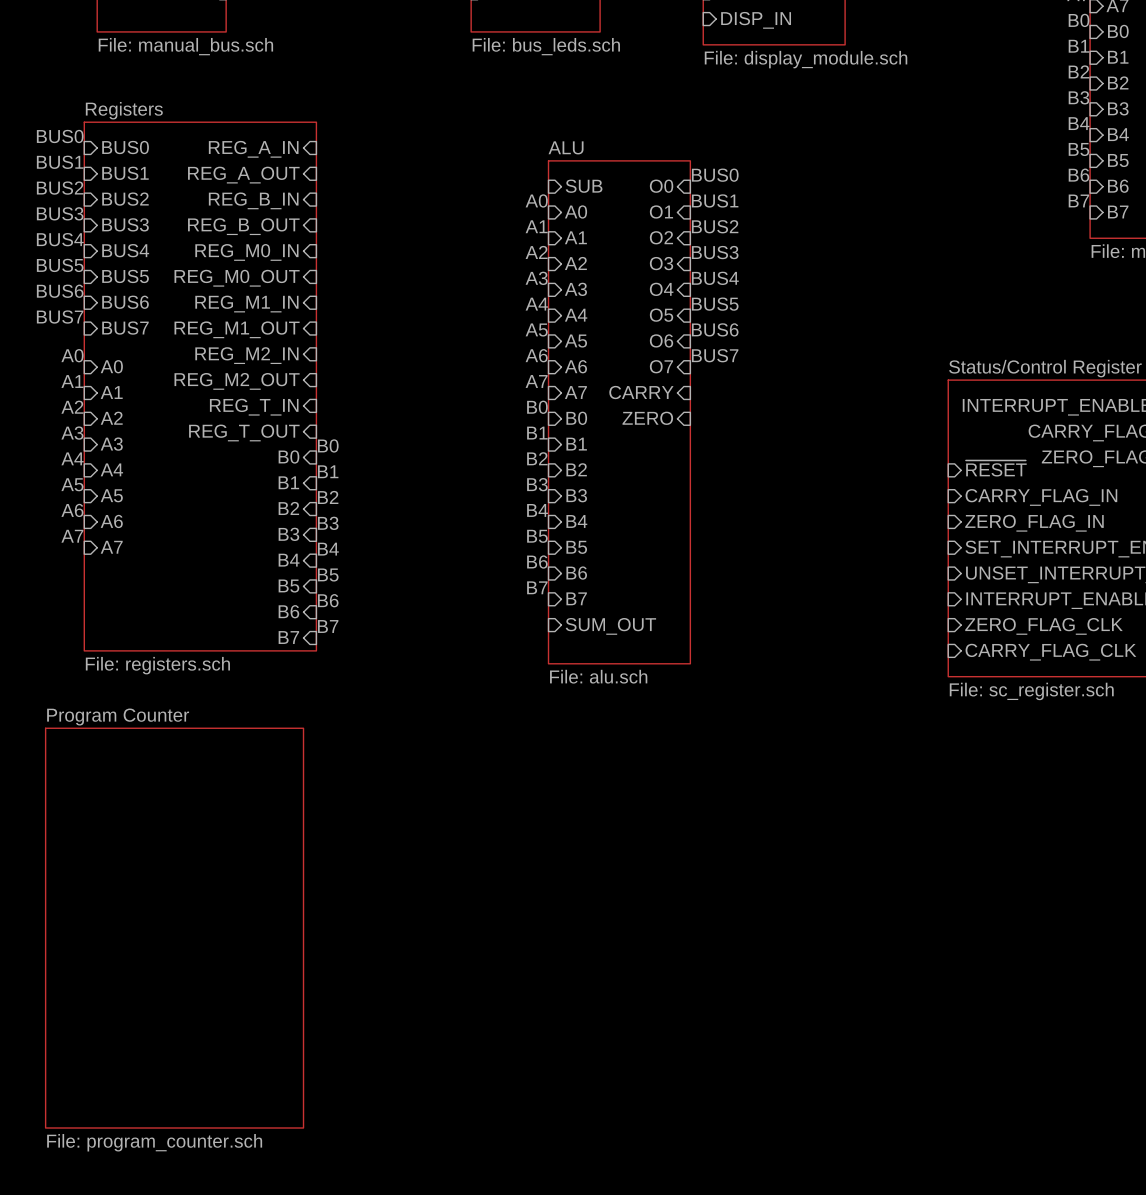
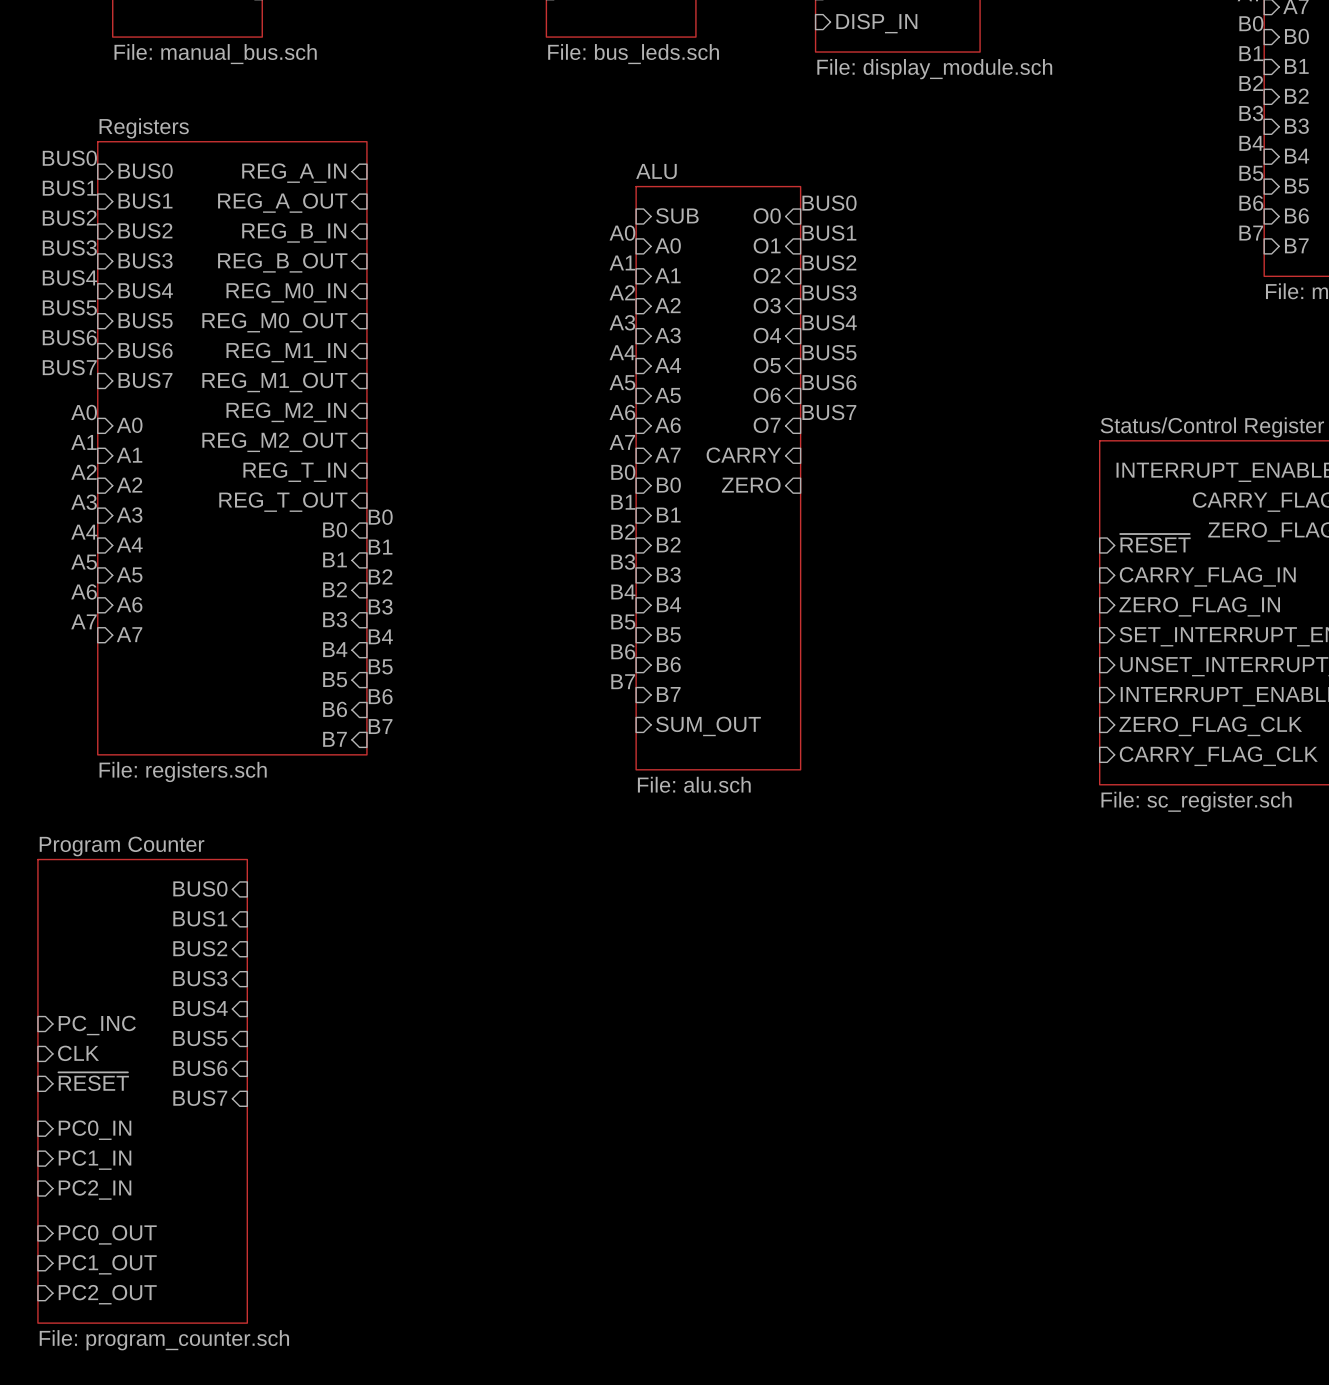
sheet pin: none -> BUS0 (200, 888)
sheet pin: none -> BUS1 (200, 918)
sheet pin: none -> BUS2 (200, 948)
sheet pin: none -> BUS3 (200, 978)
sheet pin: none -> BUS4 (200, 1008)
sheet pin: none -> PC_INC (97, 1025)
sheet pin: none -> BUS5 (200, 1038)
sheet pin: none -> CLK (78, 1053)
sheet pin: none -> BUS6 (200, 1068)
sheet Program Counter: File: program_counter.sch (174, 928) -> none
sheet pin: none -> ~{RESET} (93, 1081)
sheet Program Counter: none -> File: program_counter.sch (142, 1091)
sheet pin: none -> BUS7 (200, 1098)
sheet pin: none -> PC0_IN (95, 1130)
sheet pin: none -> PC1_IN (95, 1160)
sheet pin: none -> PC2_IN (95, 1190)
sheet pin: none -> PC0_OUT (107, 1234)
sheet pin: none -> PC1_OUT (107, 1264)
sheet pin: none -> PC2_OUT (107, 1294)

